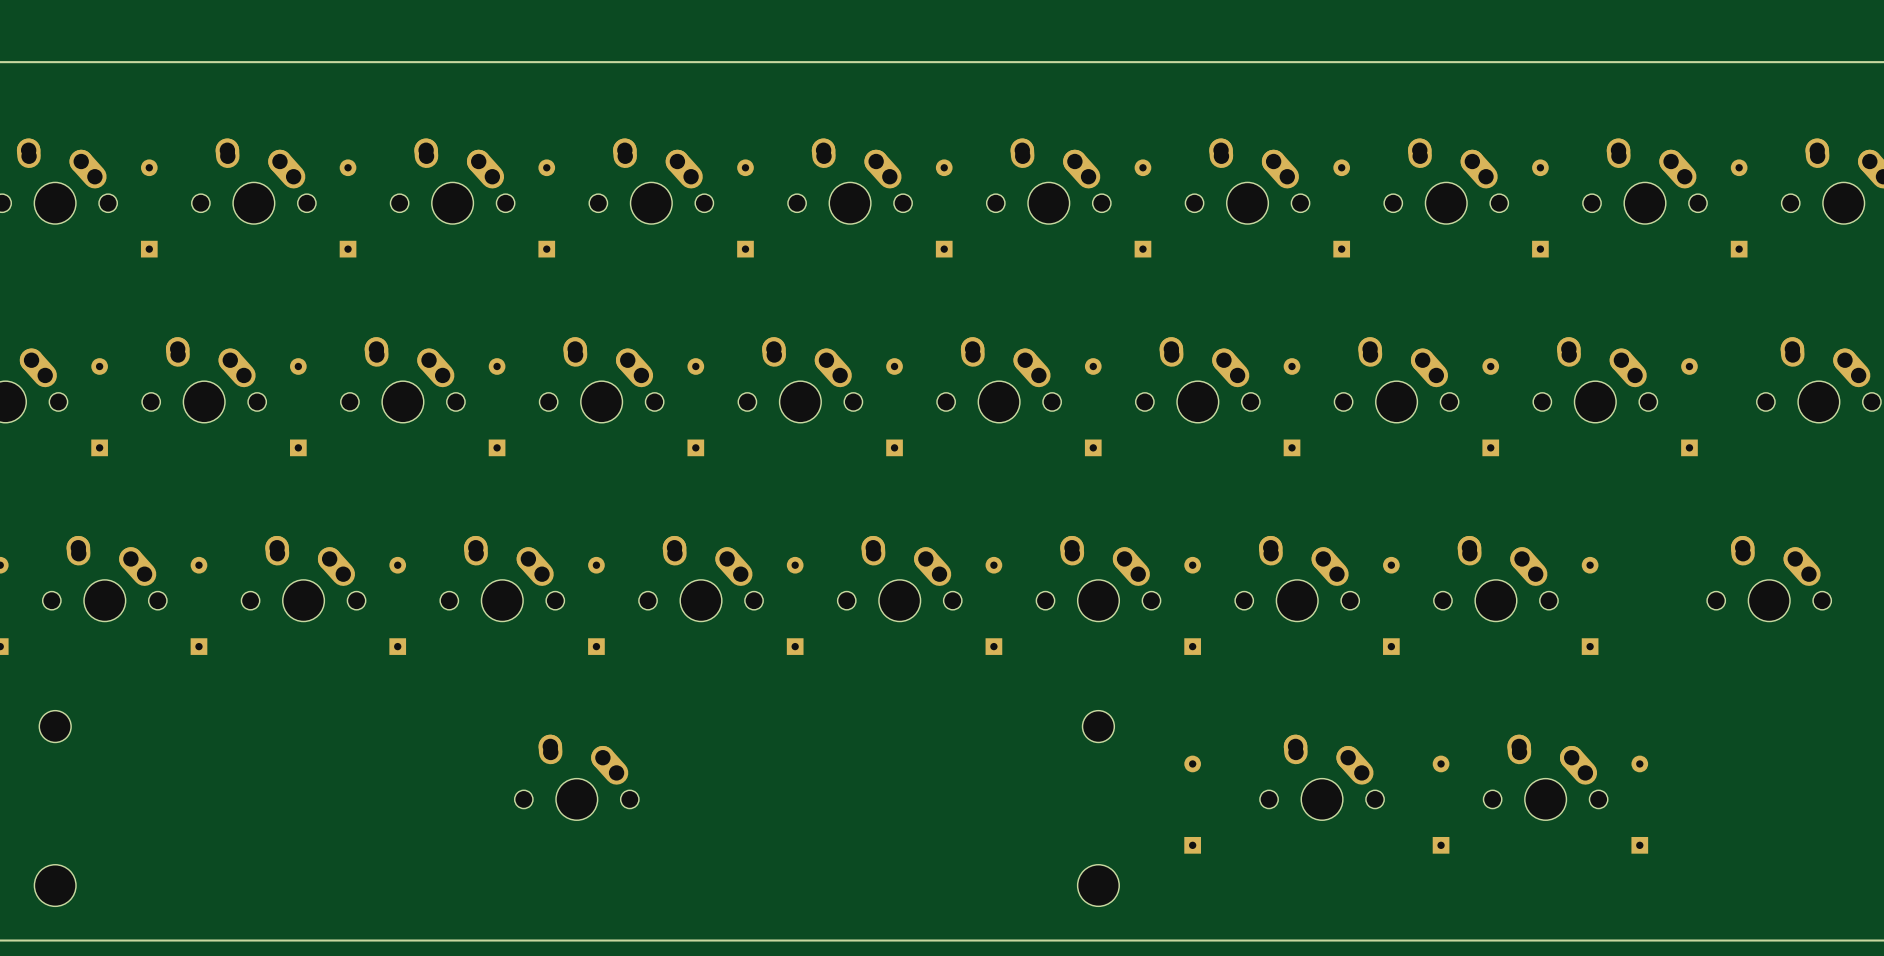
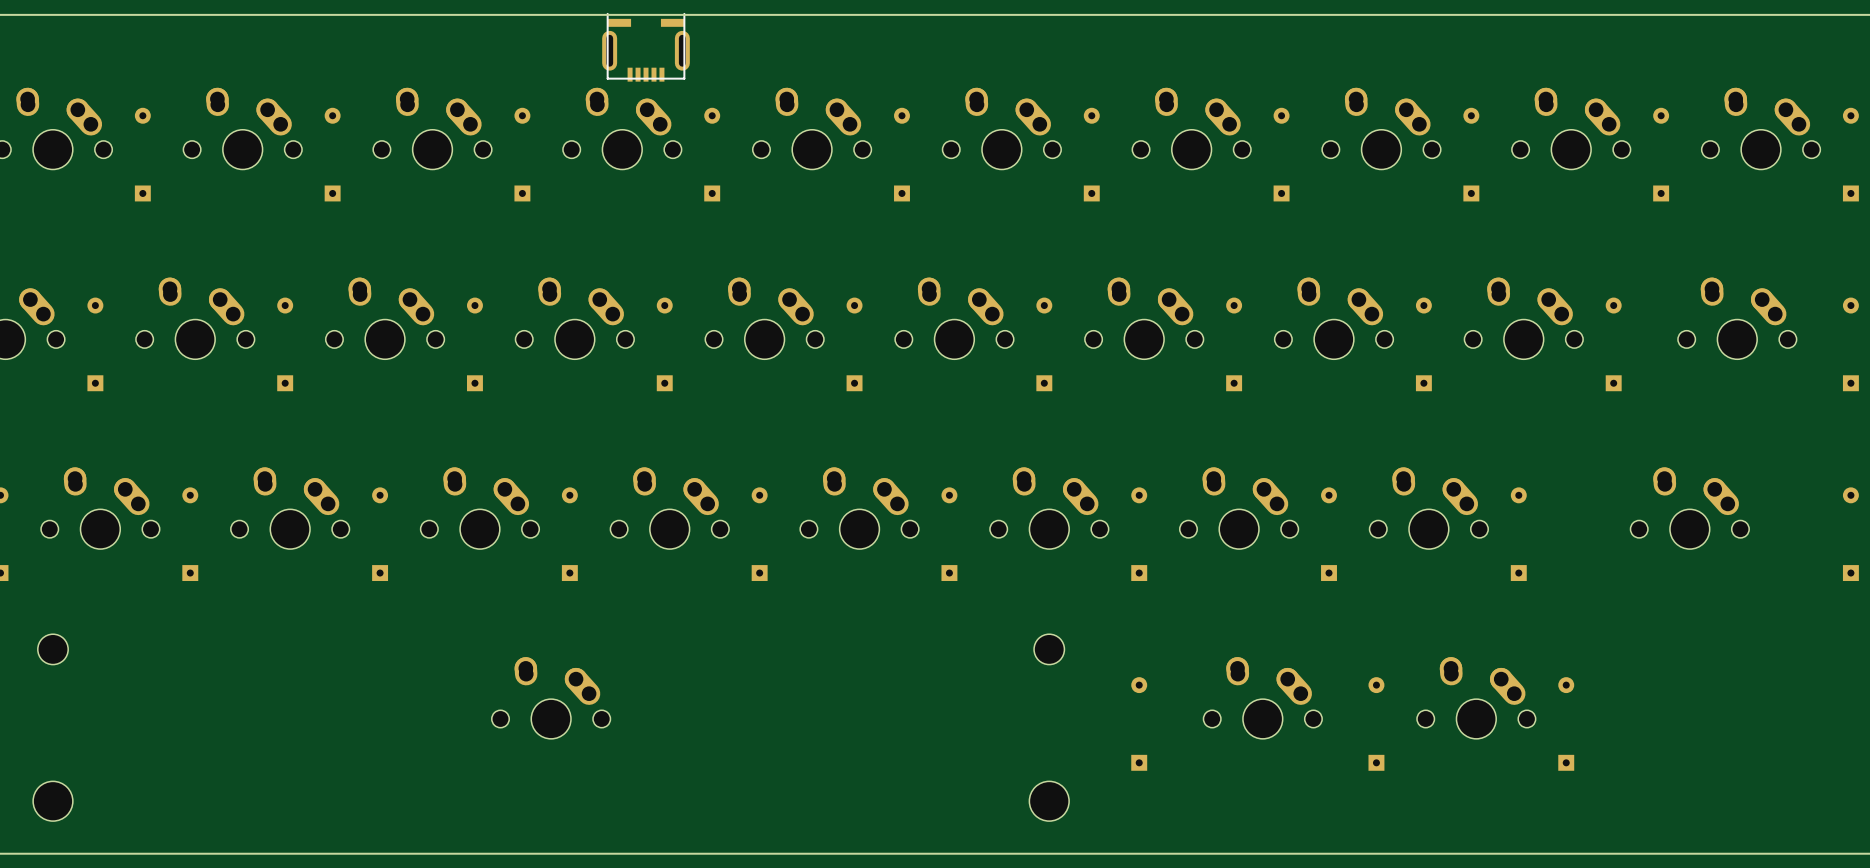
part: none -> (646, 47)

